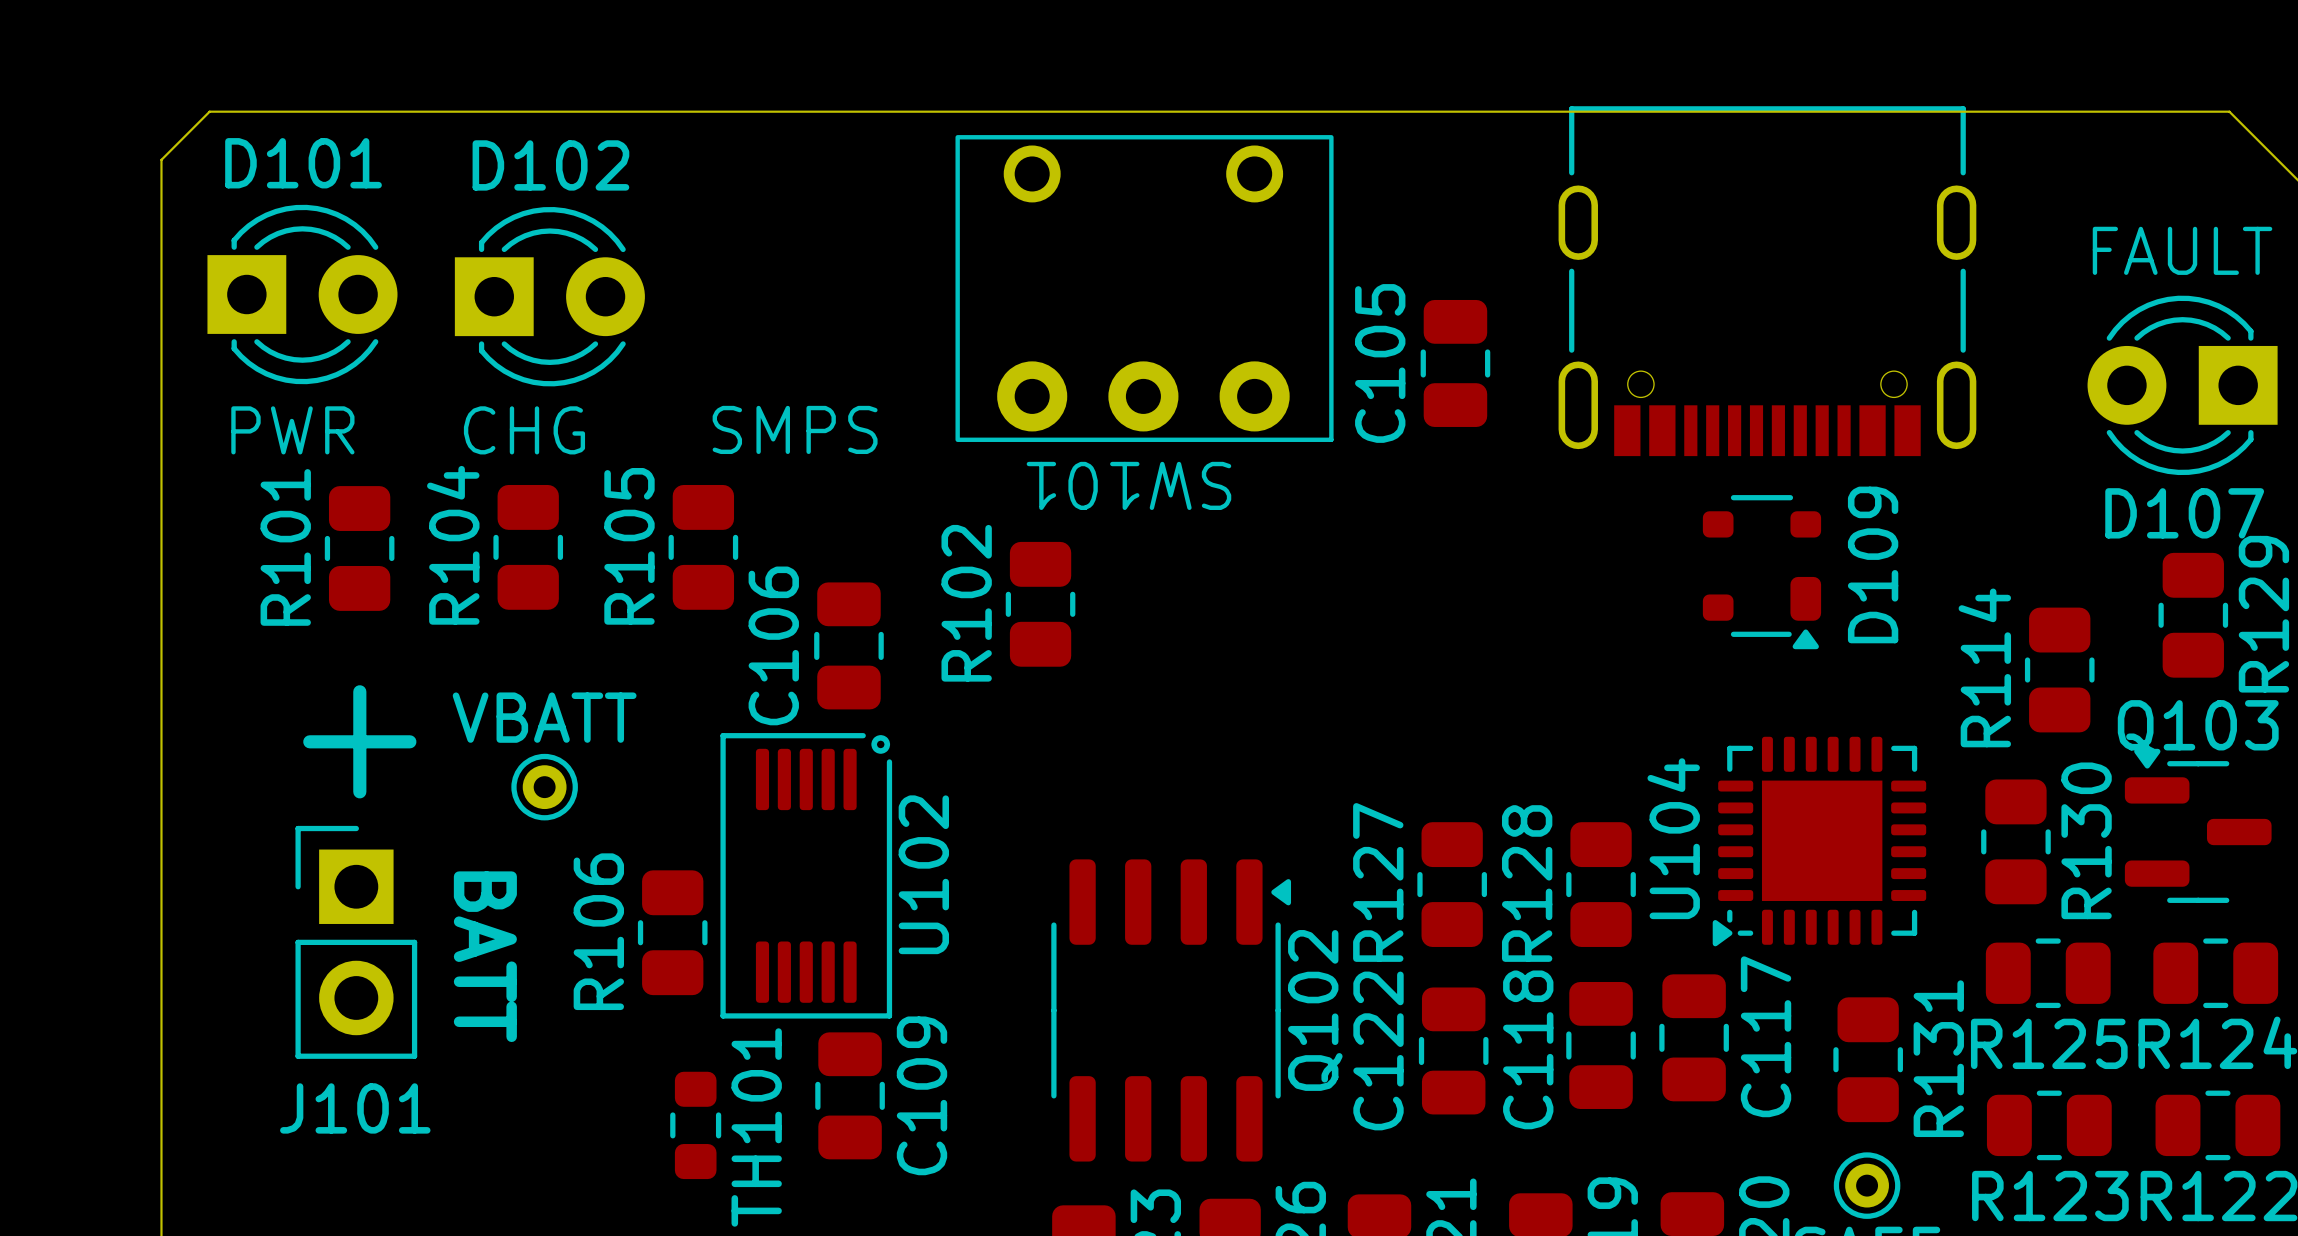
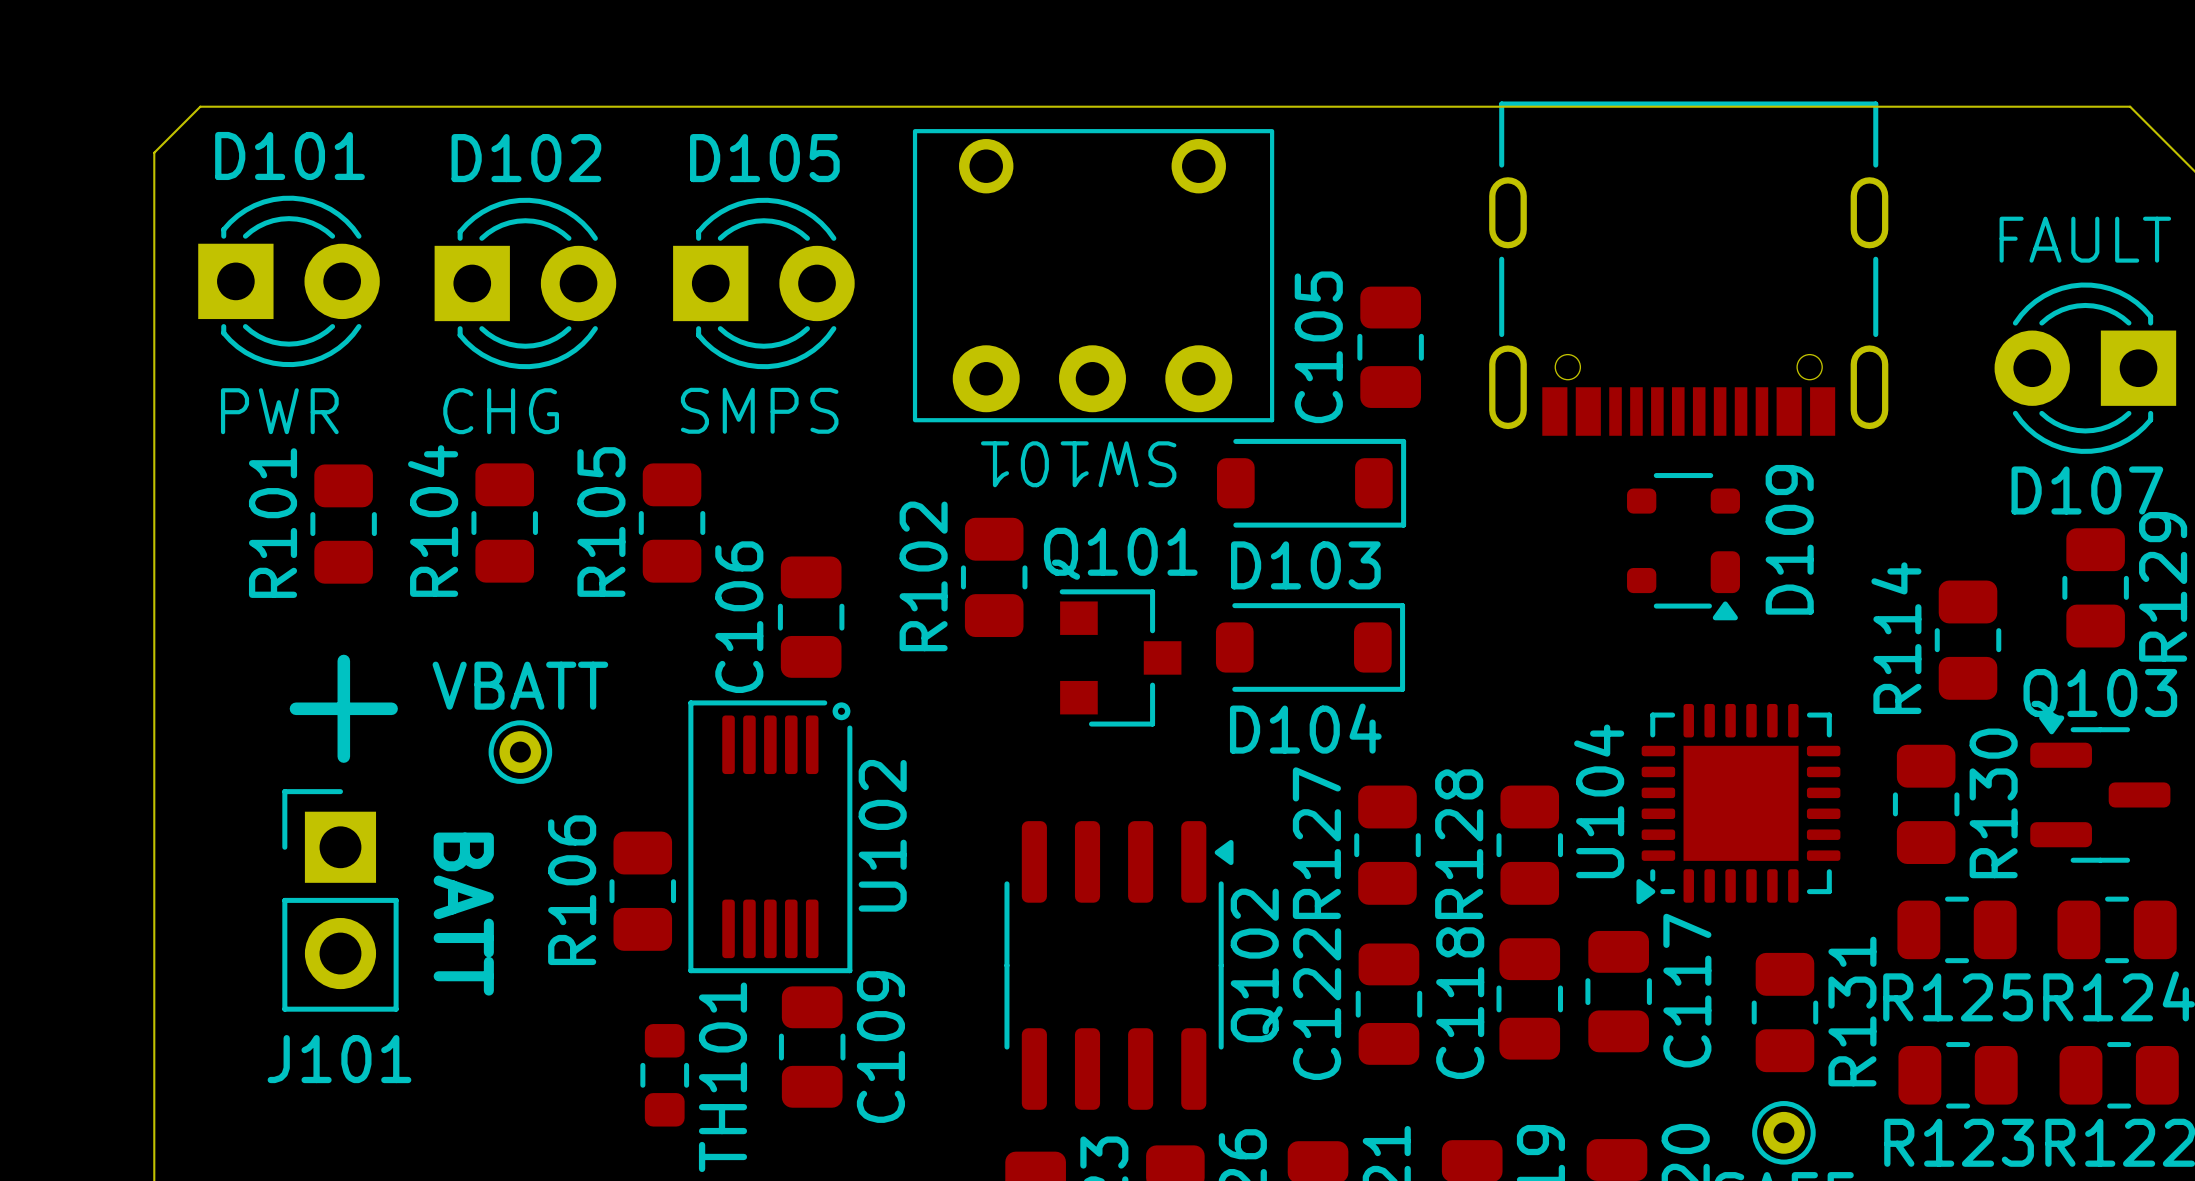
D105: none -> (763, 283)
D103: none -> (1311, 483)
D104: none -> (1310, 647)
Q101: none -> (1120, 657)

